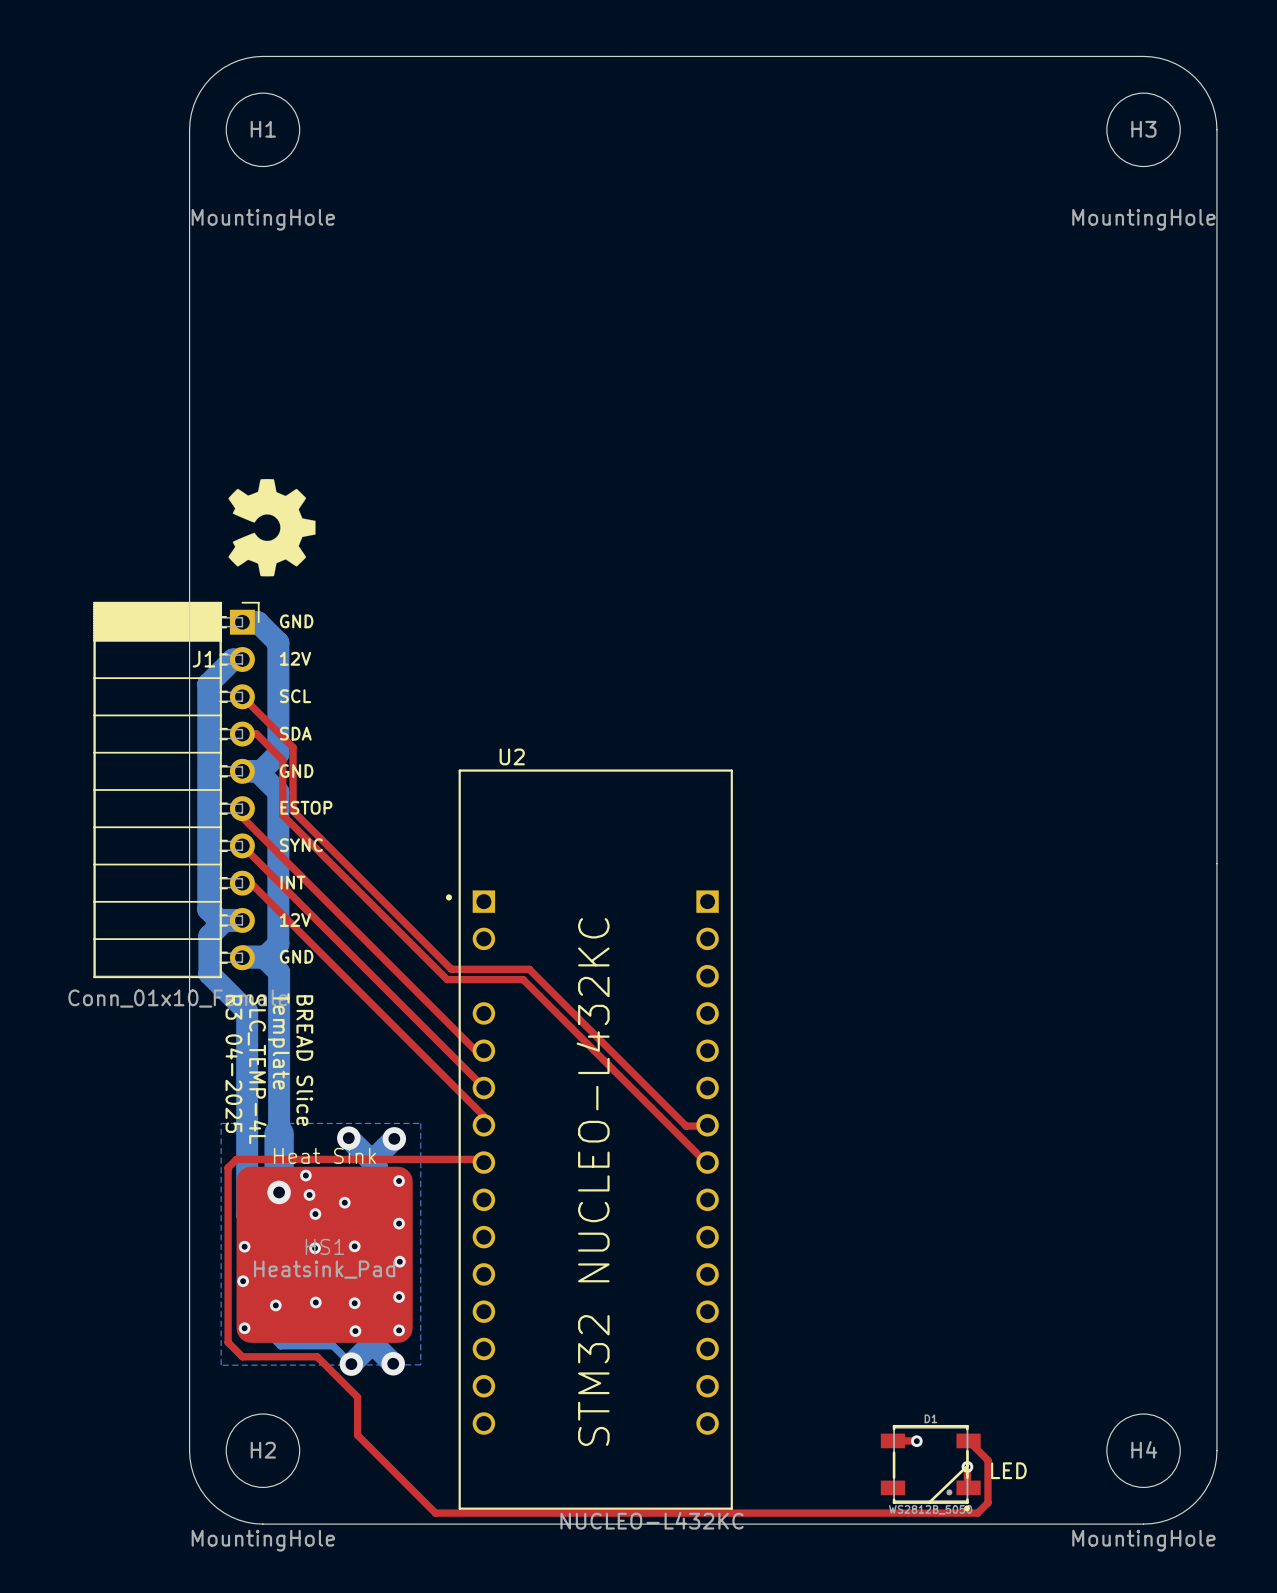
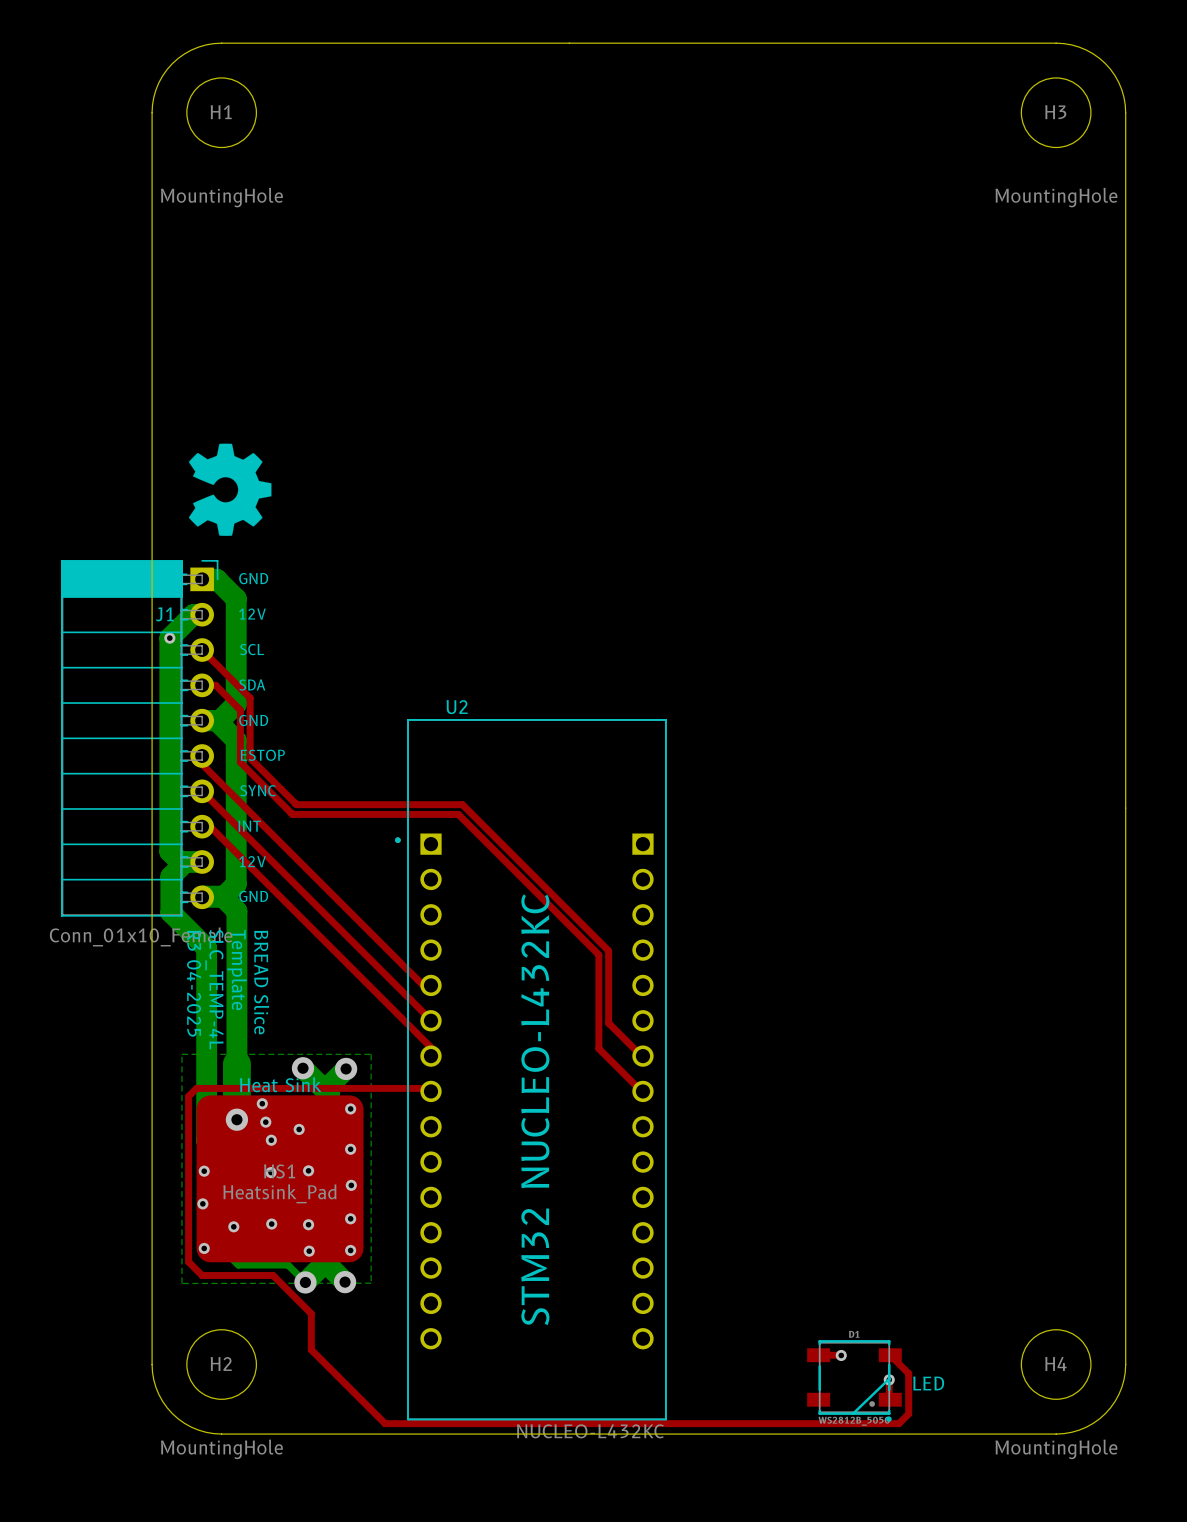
via: none -> (169, 638)
U2 footprint: [446, 769, 733, 1510] -> [395, 719, 667, 1421]
top track: (342, 859) (451, 969) (529, 969) (686, 1126) (706, 1126) -> (296, 804) (462, 804) (608, 950) (608, 1023) (642, 1056)
top track: (337, 870) (447, 979) (523, 979) (661, 1117) -> (292, 814) (458, 814) (598, 954) (598, 1048)

